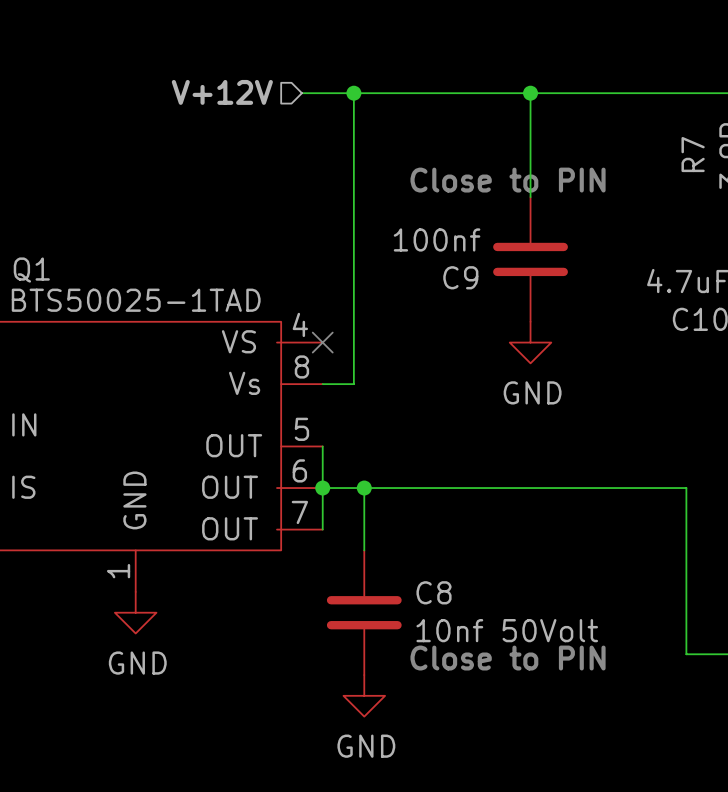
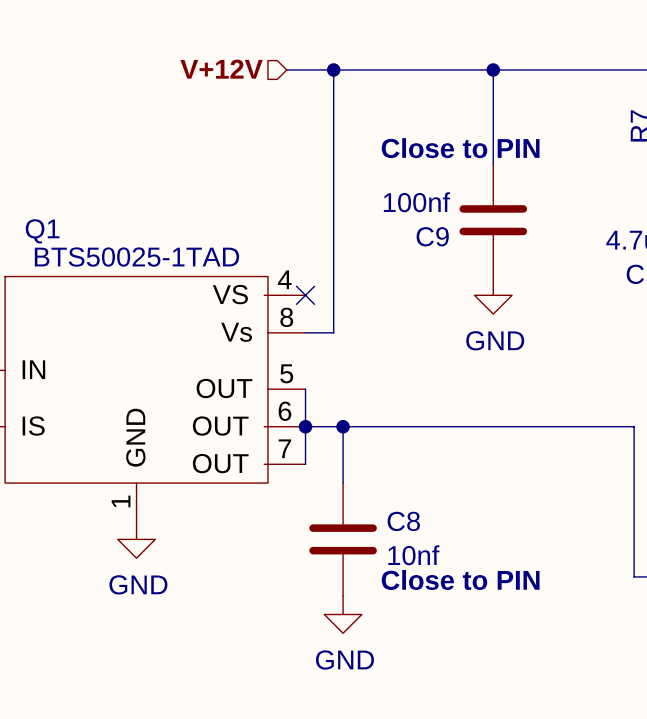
C8 value: 10nf 50Volt (507, 630) -> 10nf (413, 555)

